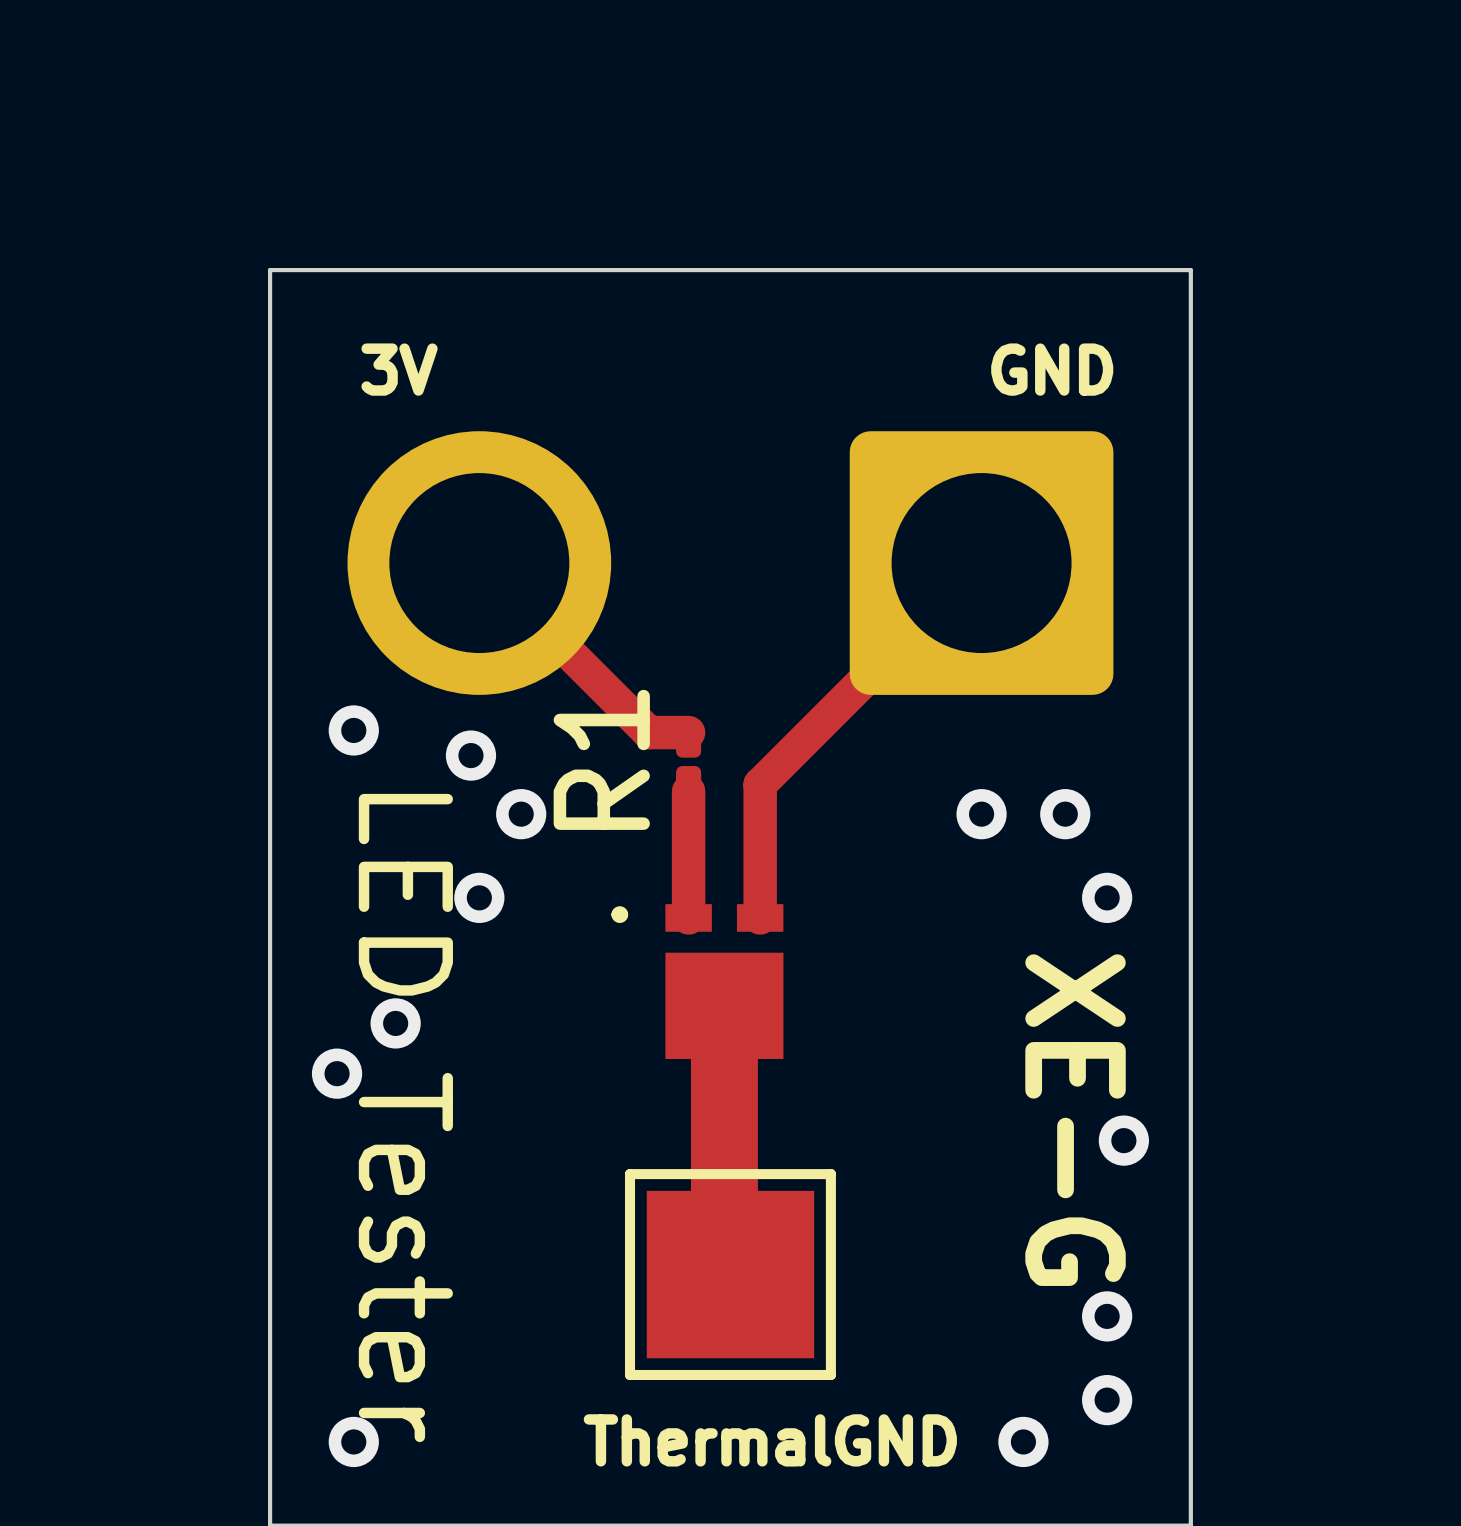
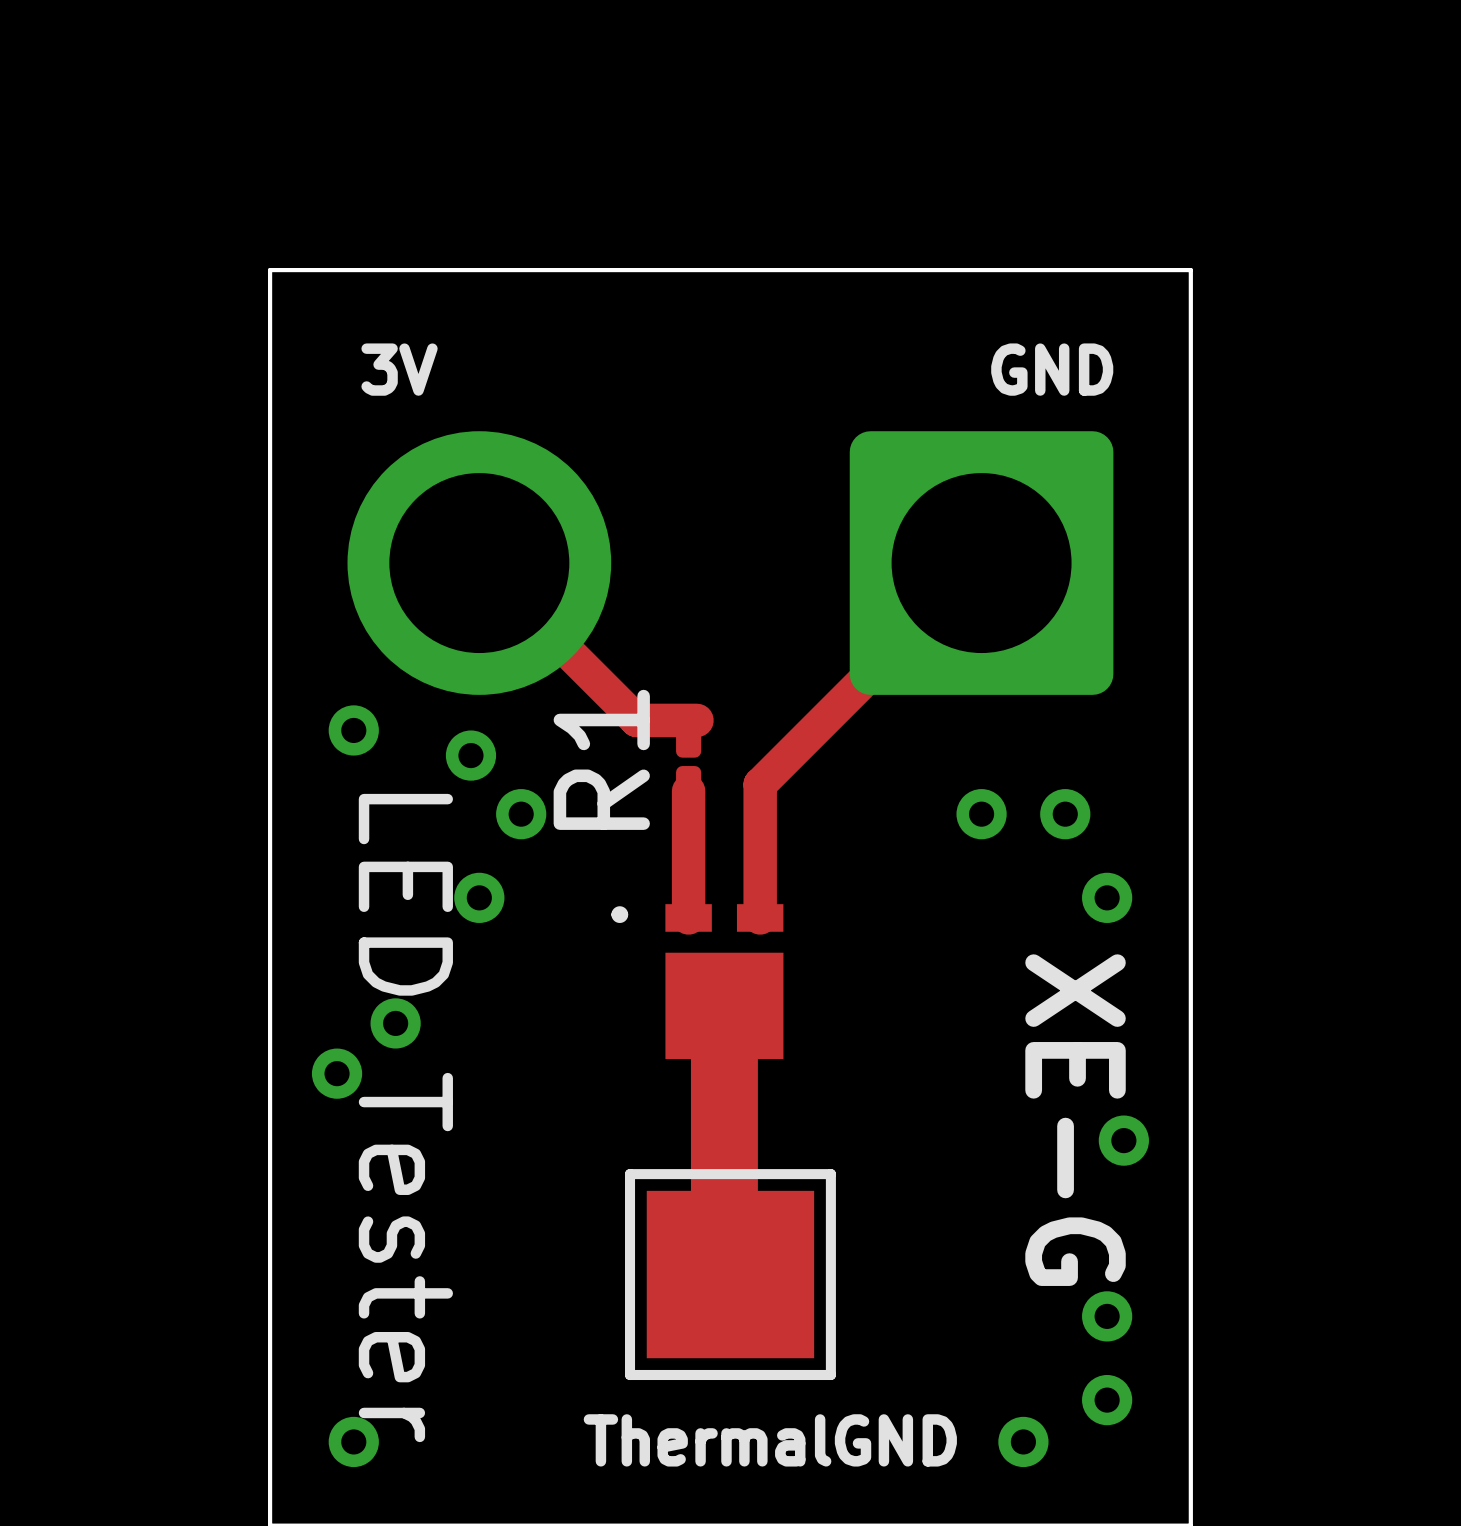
track: (636, 720) (648, 732) (688, 732) -> (636, 720) (696, 720)

